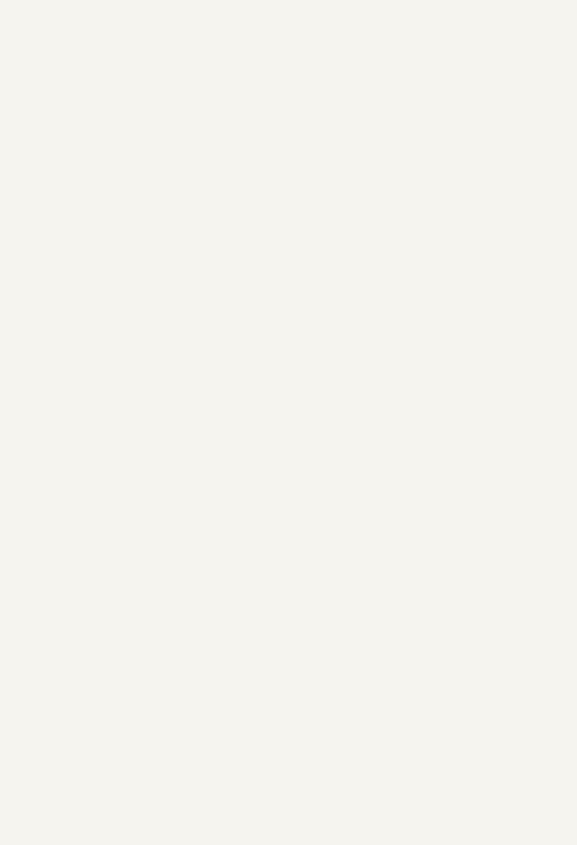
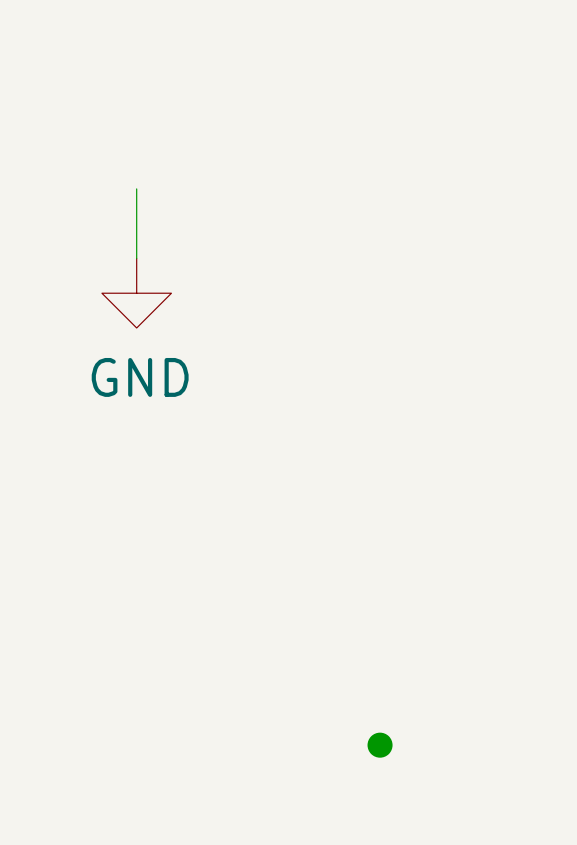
wire: none -> (136, 188) (136, 258)
power symbol: none -> GND (136, 293)
junction: none -> (380, 745)

